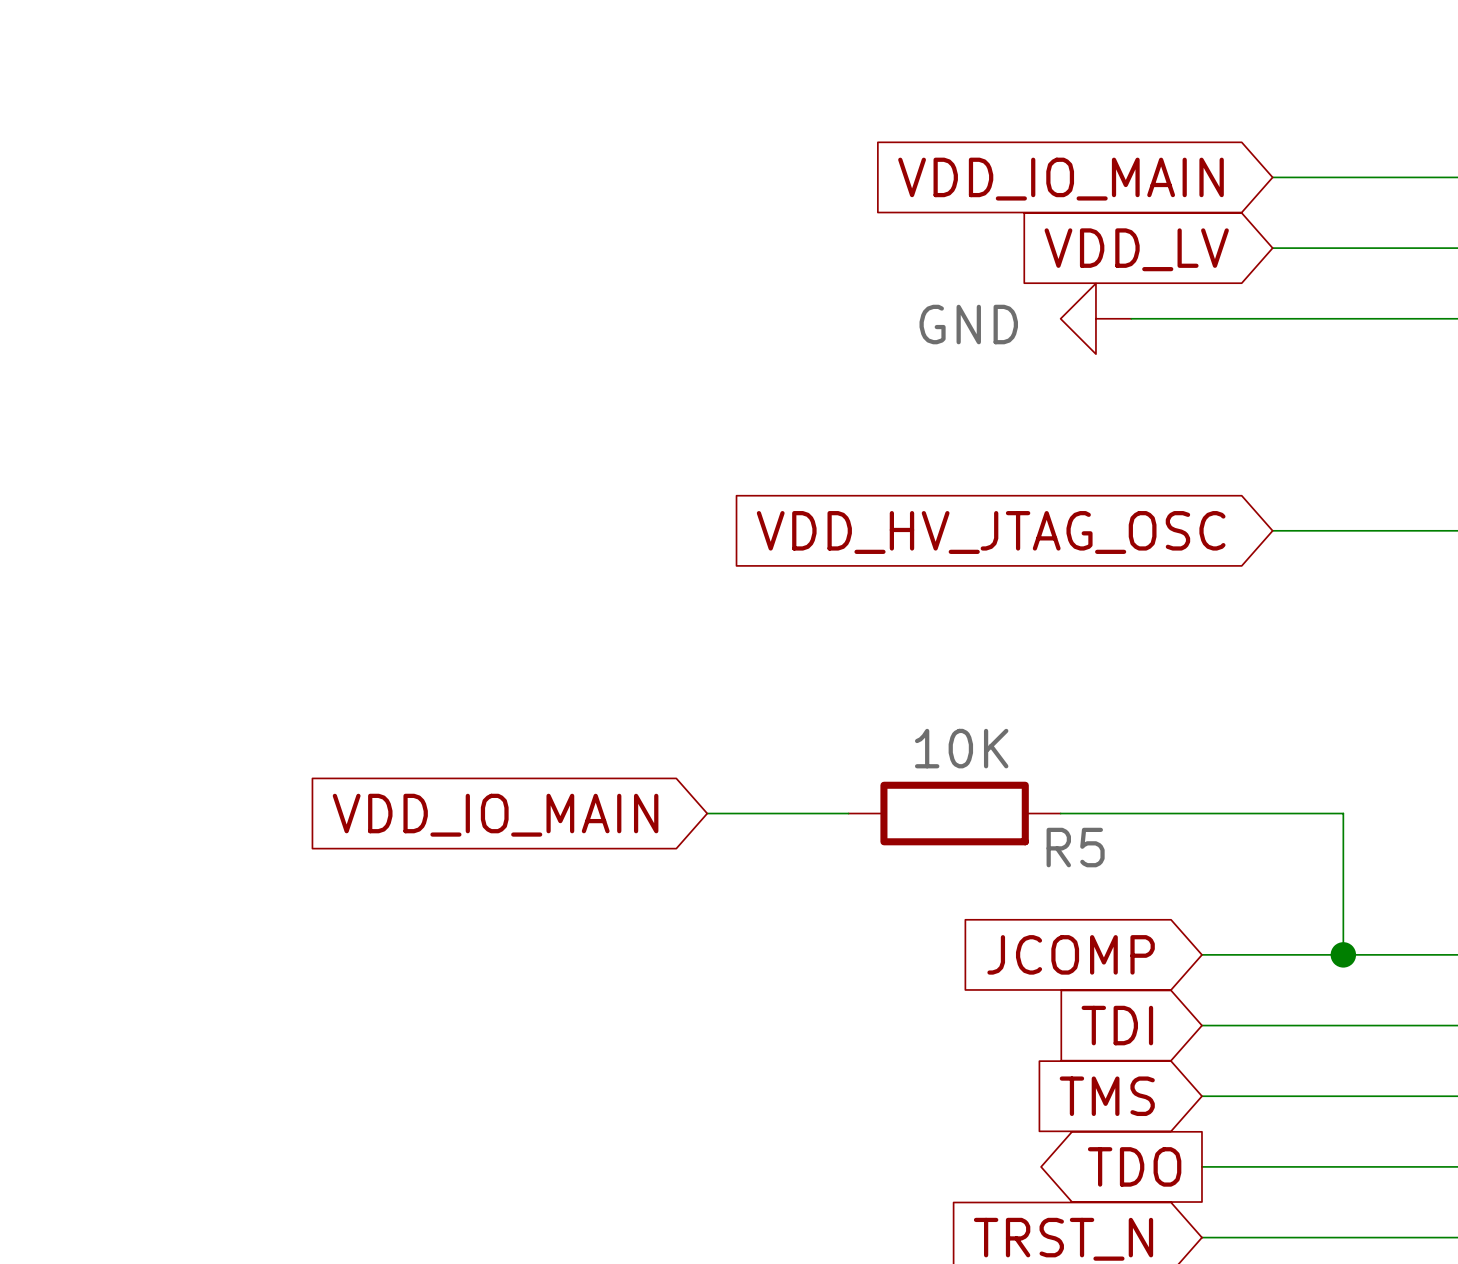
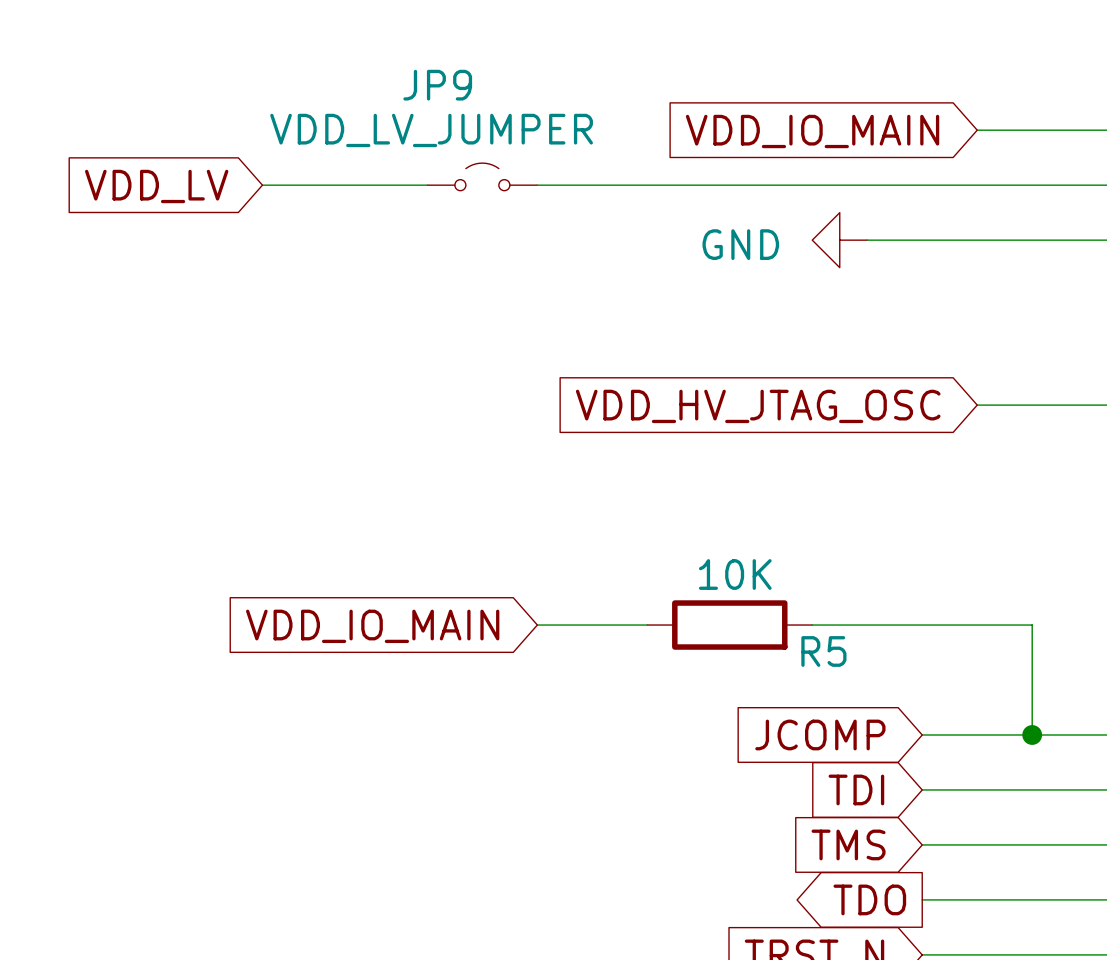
JP9: none -> VDD_LV_JUMPER (482, 176)
wire: none -> (262, 185) (427, 185)
wire: none -> (537, 185) (977, 185)
global label: none -> VDD_LV (156, 186)
global label: VDD_LV (1136, 249) -> none

